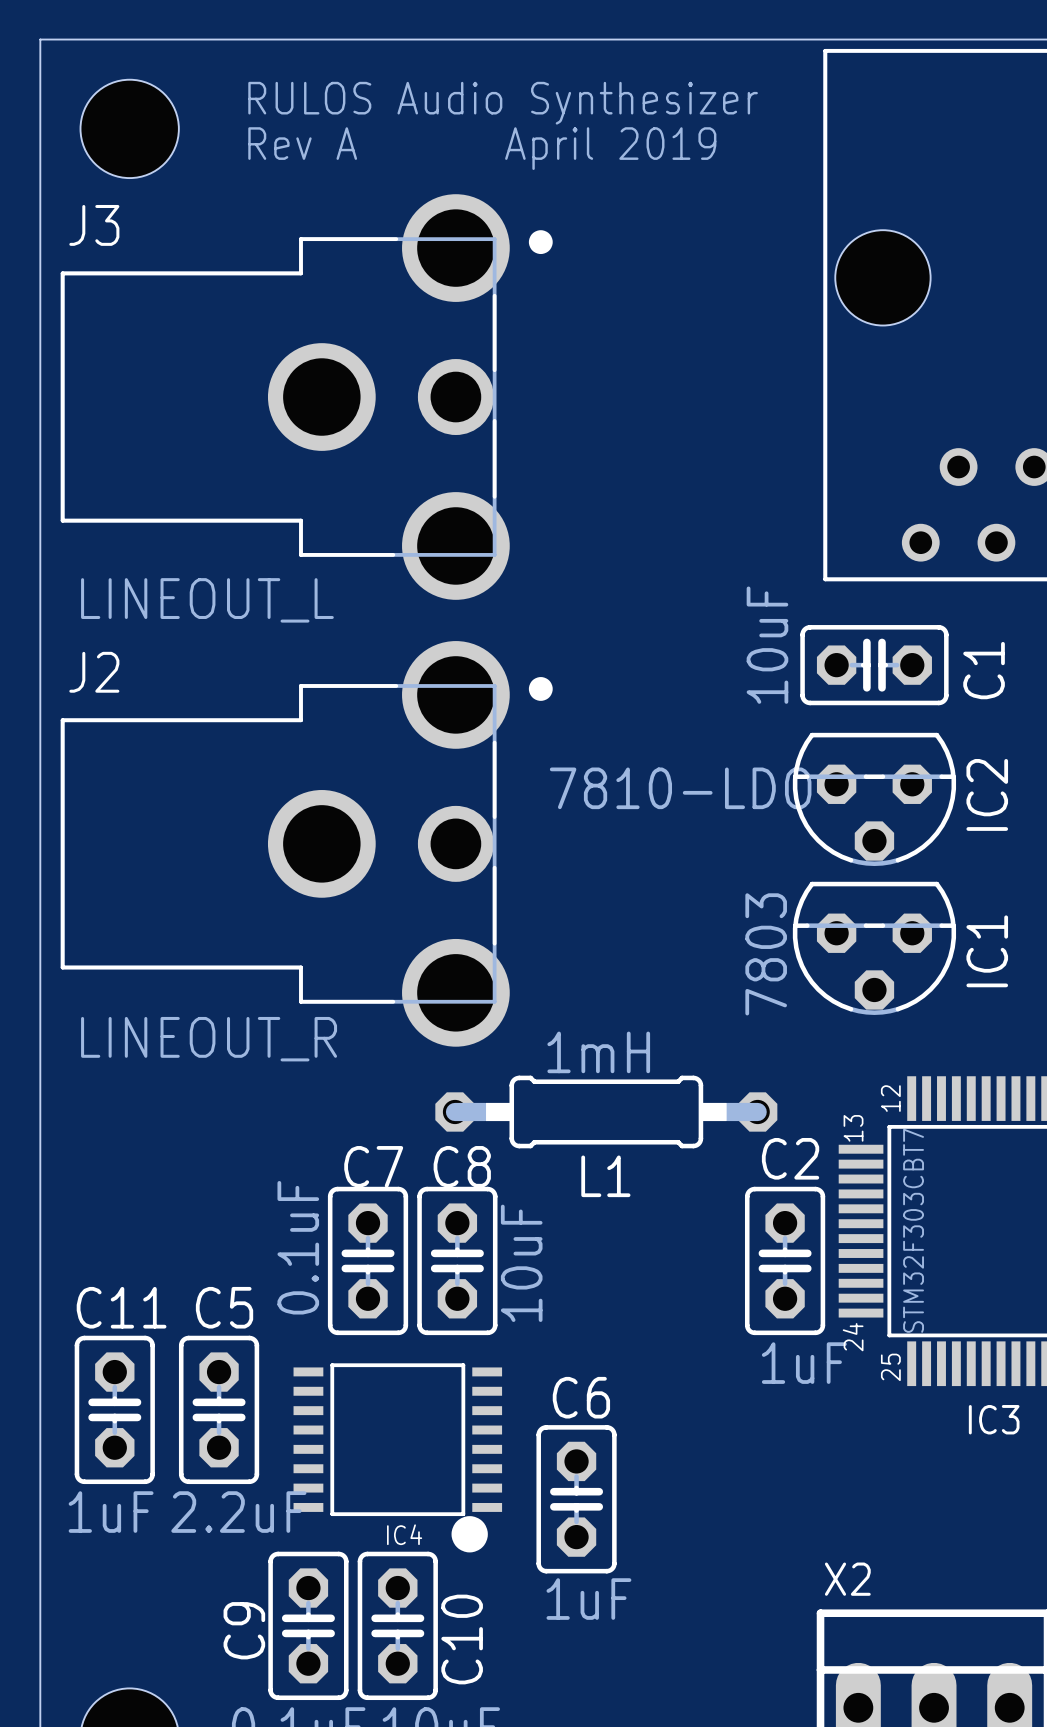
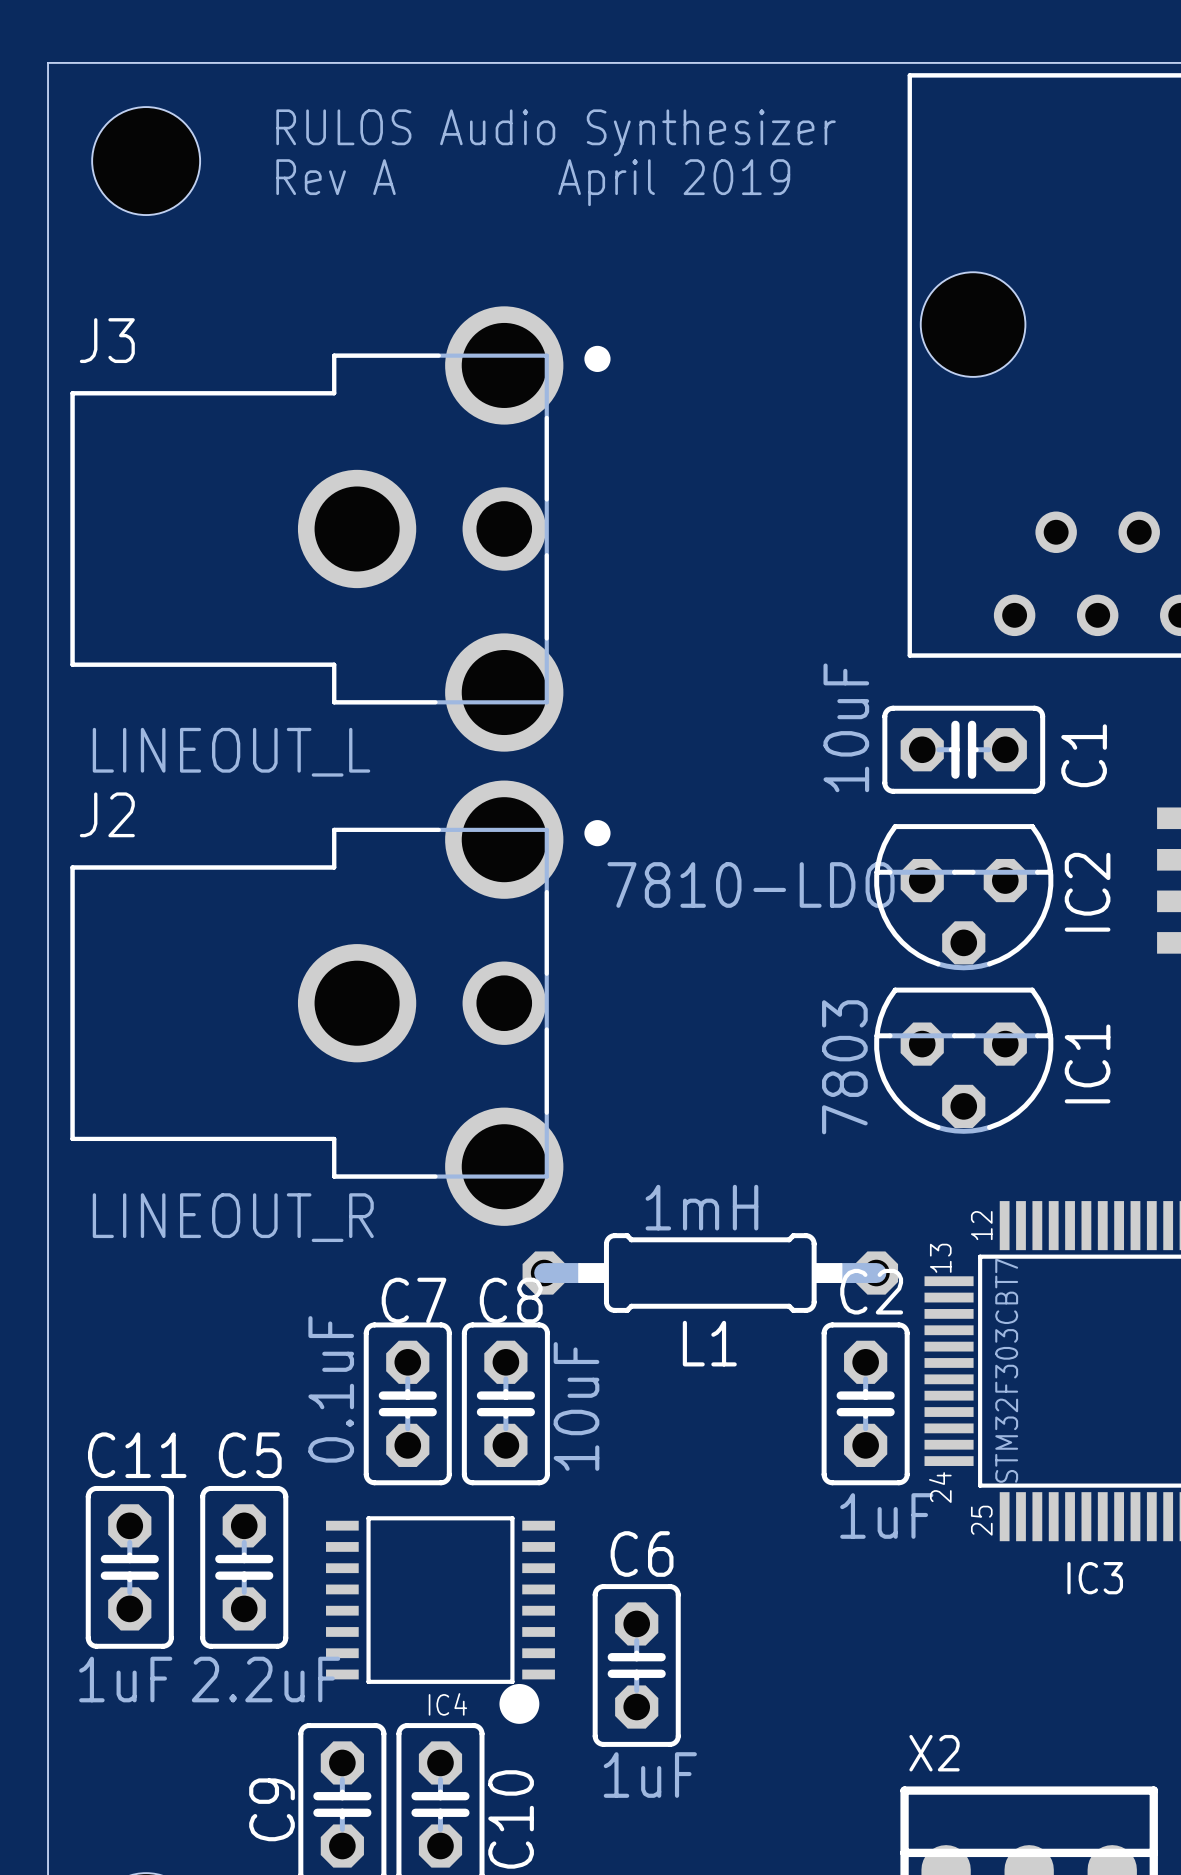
J3 position: (306, 397) -> (340, 528)
J2 position: (306, 843) -> (340, 1003)
L1 position: (606, 1111) -> (710, 1273)

